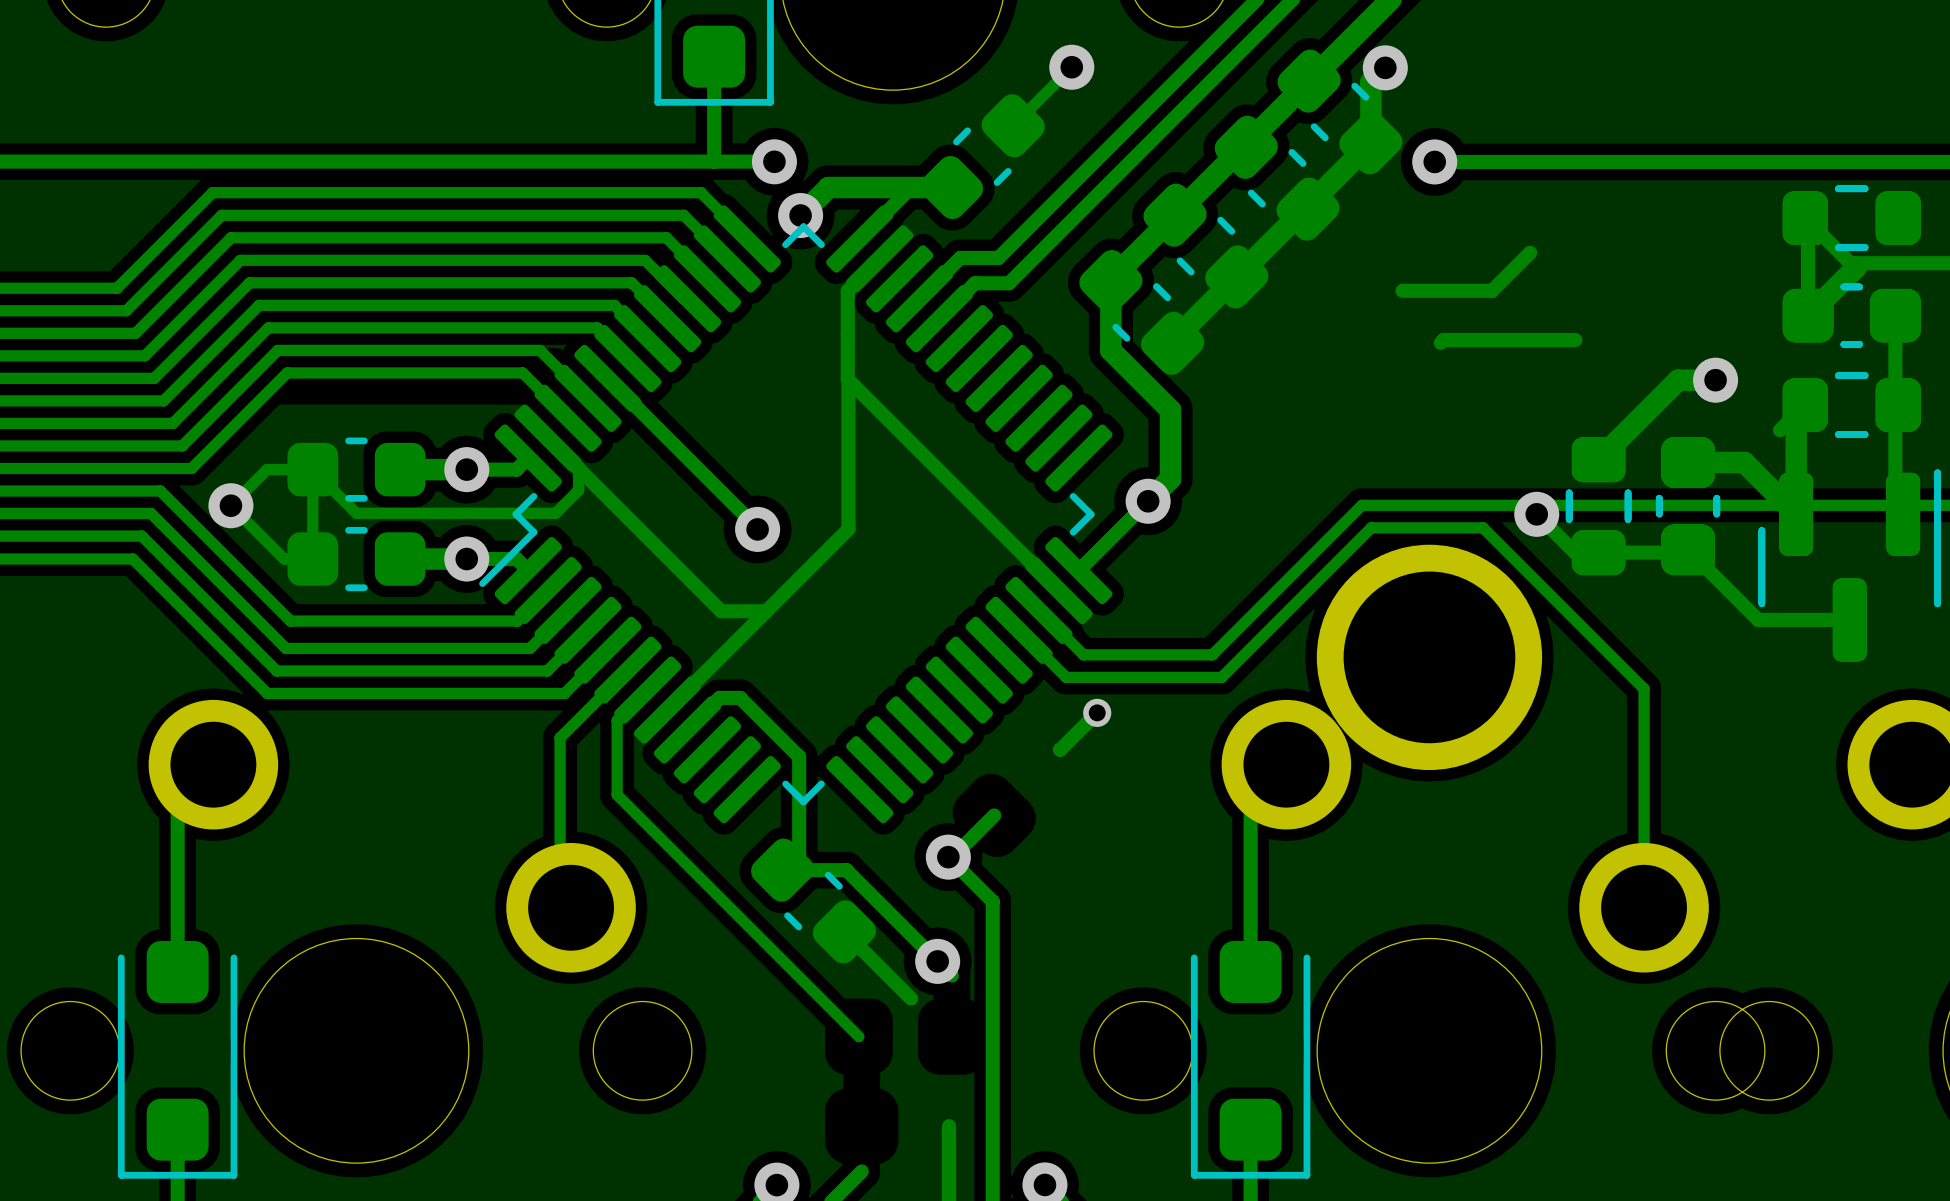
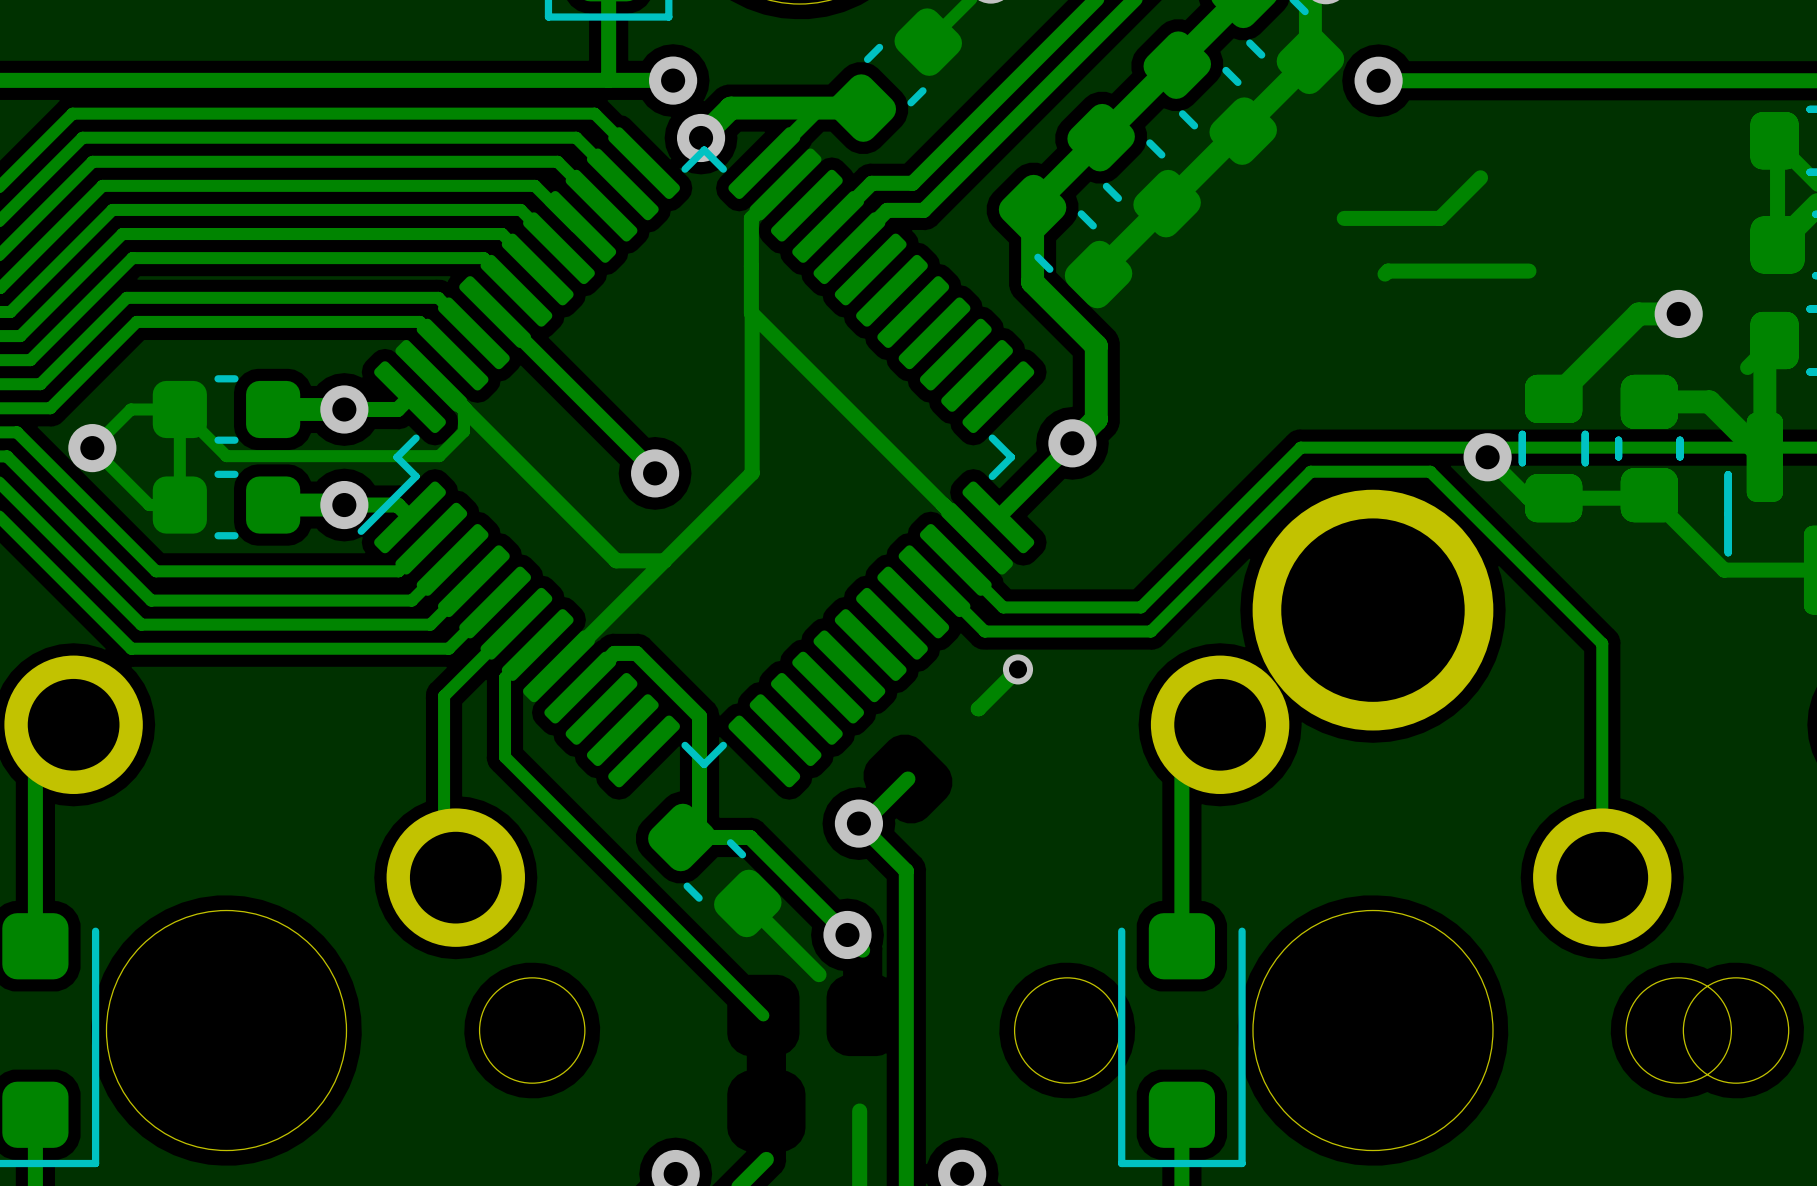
track: (554, 365) (540, 350) (277, 350) (263, 365) -> (438, 297) (126, 297)
track: (537, 387) (522, 372) (287, 372) (272, 387) -> (419, 321) (136, 321)

